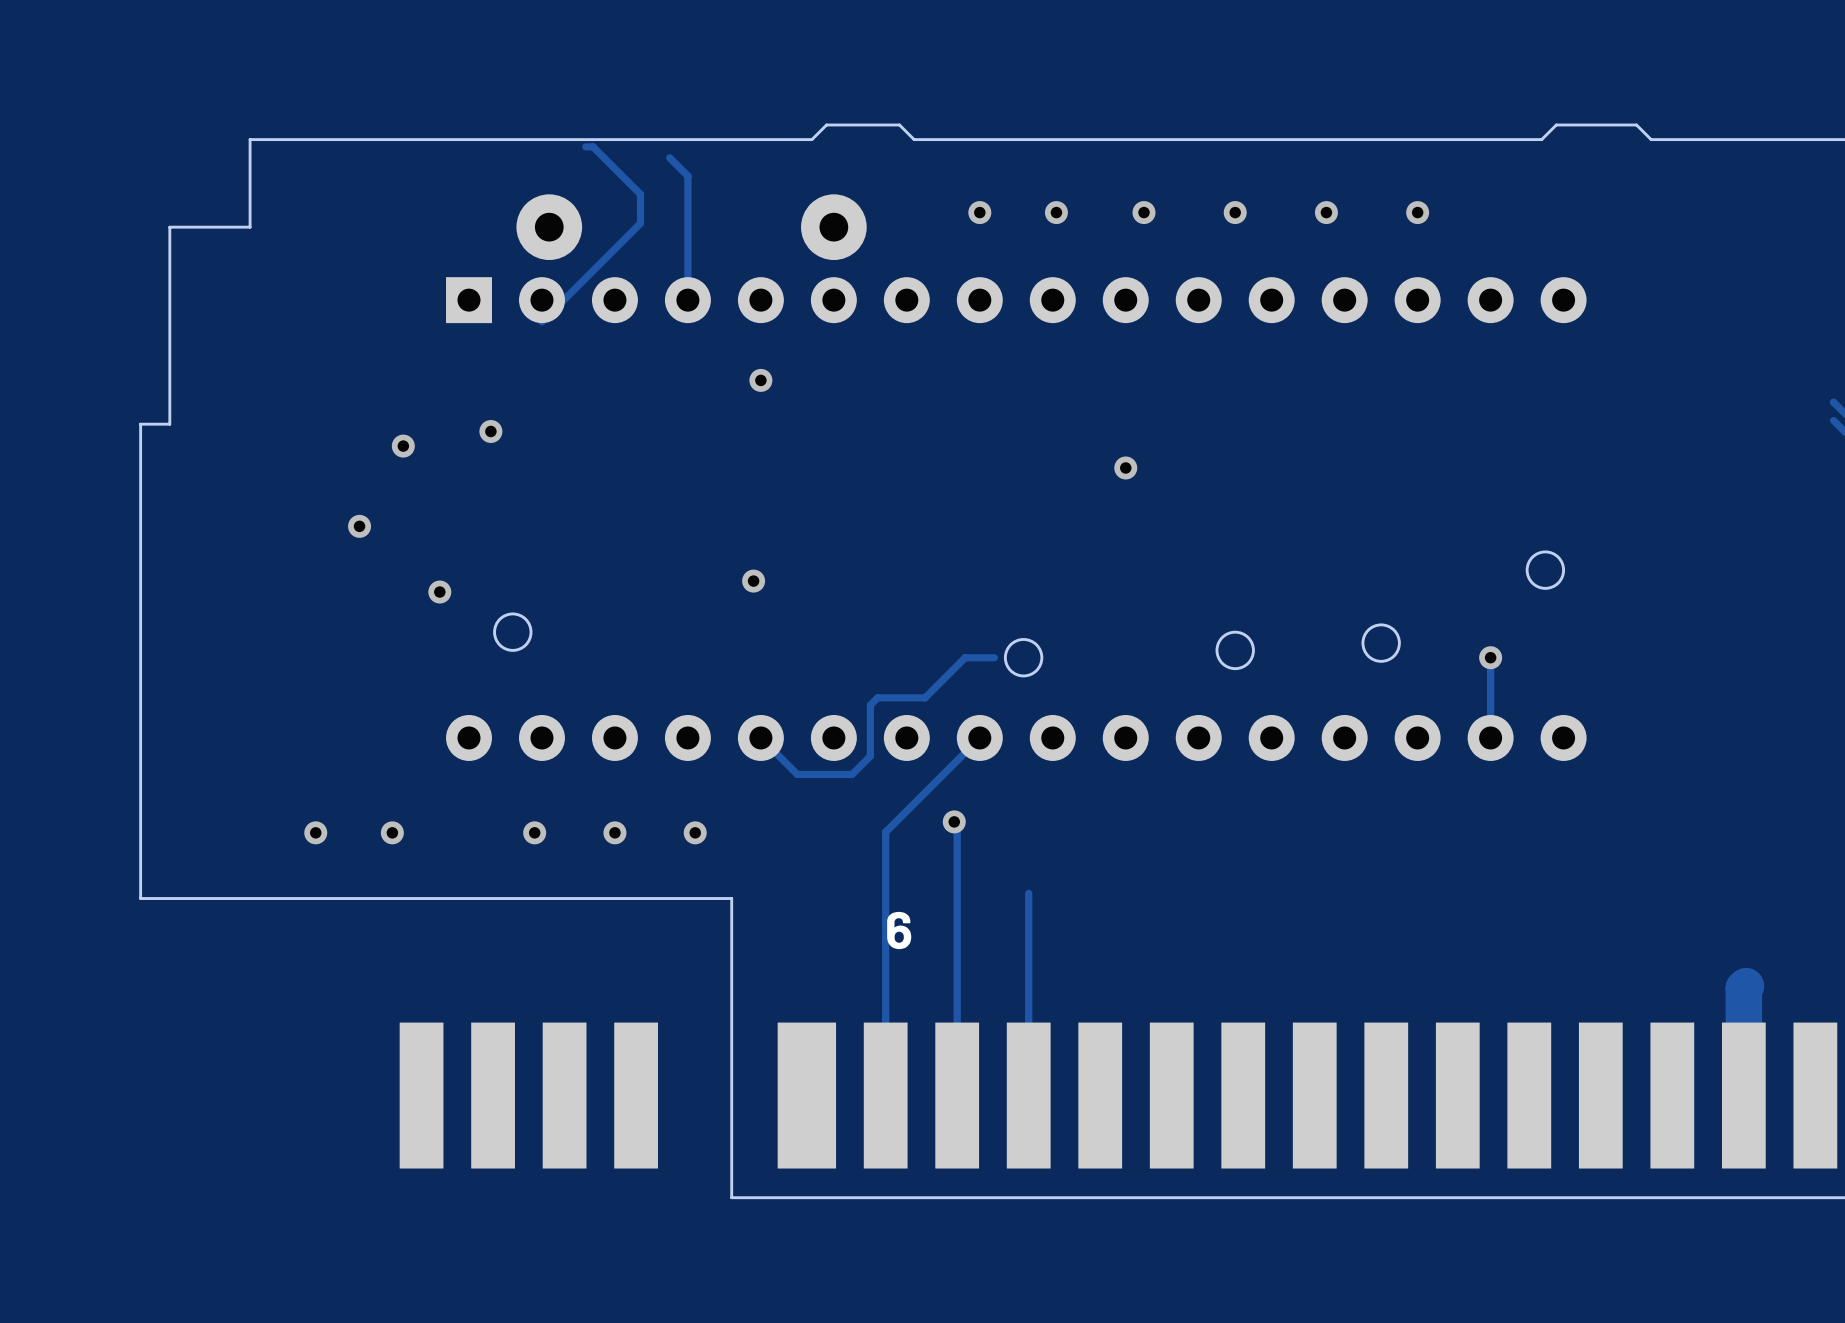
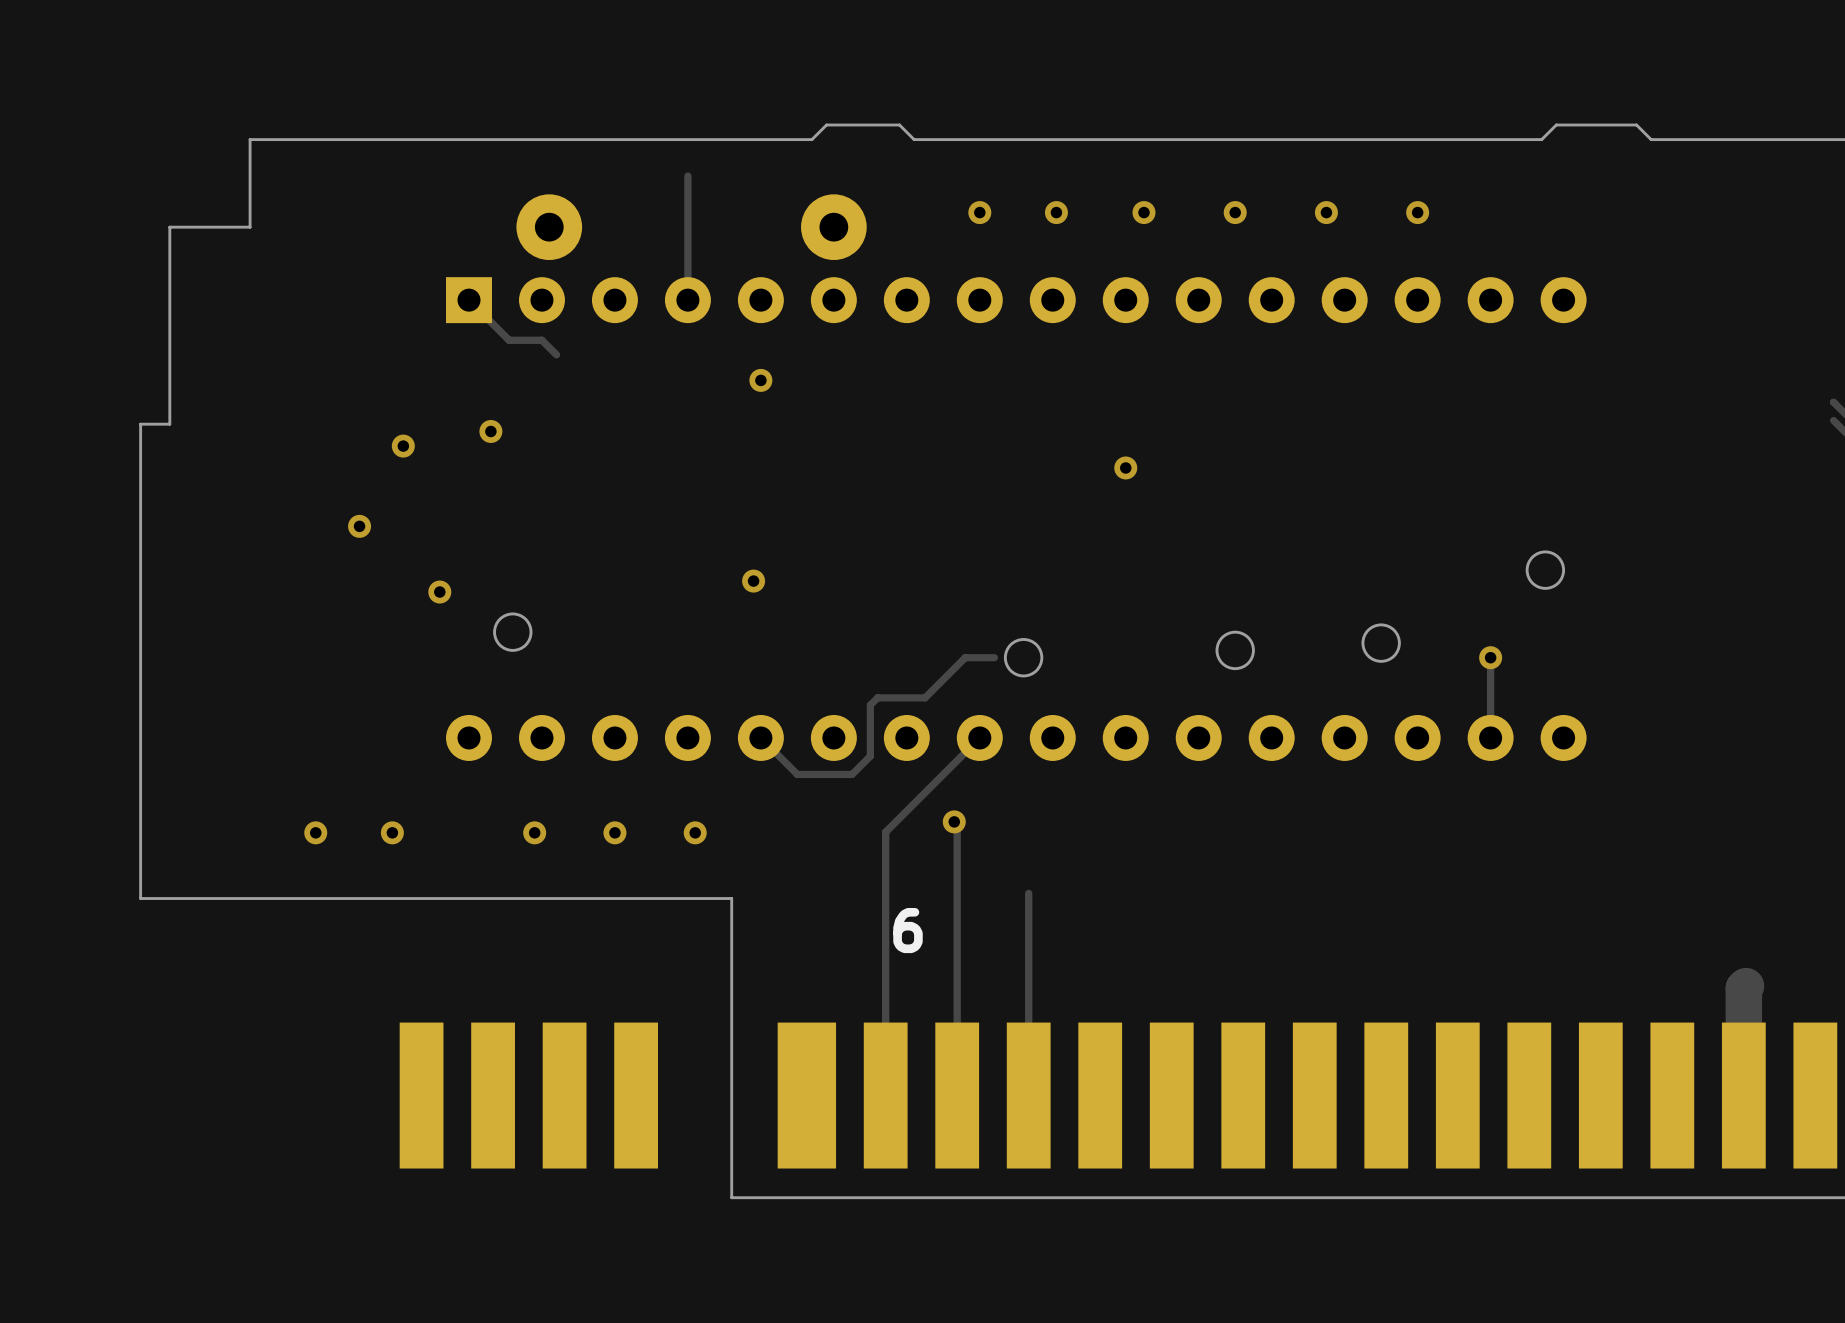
track: (585, 146) (593, 146) (640, 194) (640, 223) (541, 321) -> none
track: (669, 157) (687, 176) -> none
track: none -> (469, 300) (509, 340) (541, 340) (556, 354)

